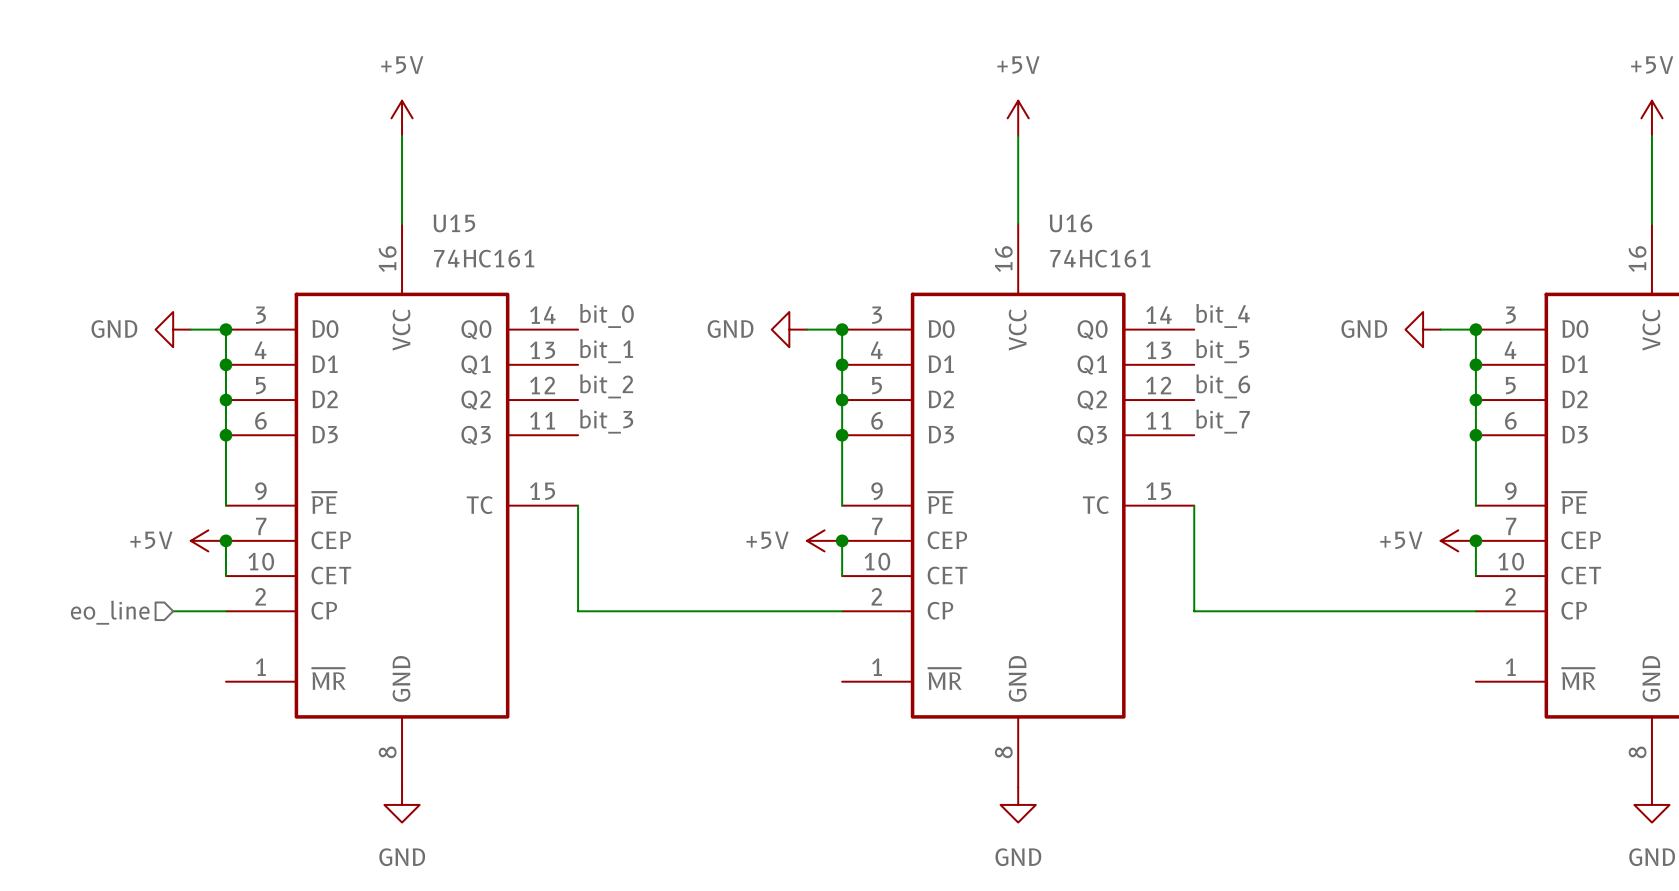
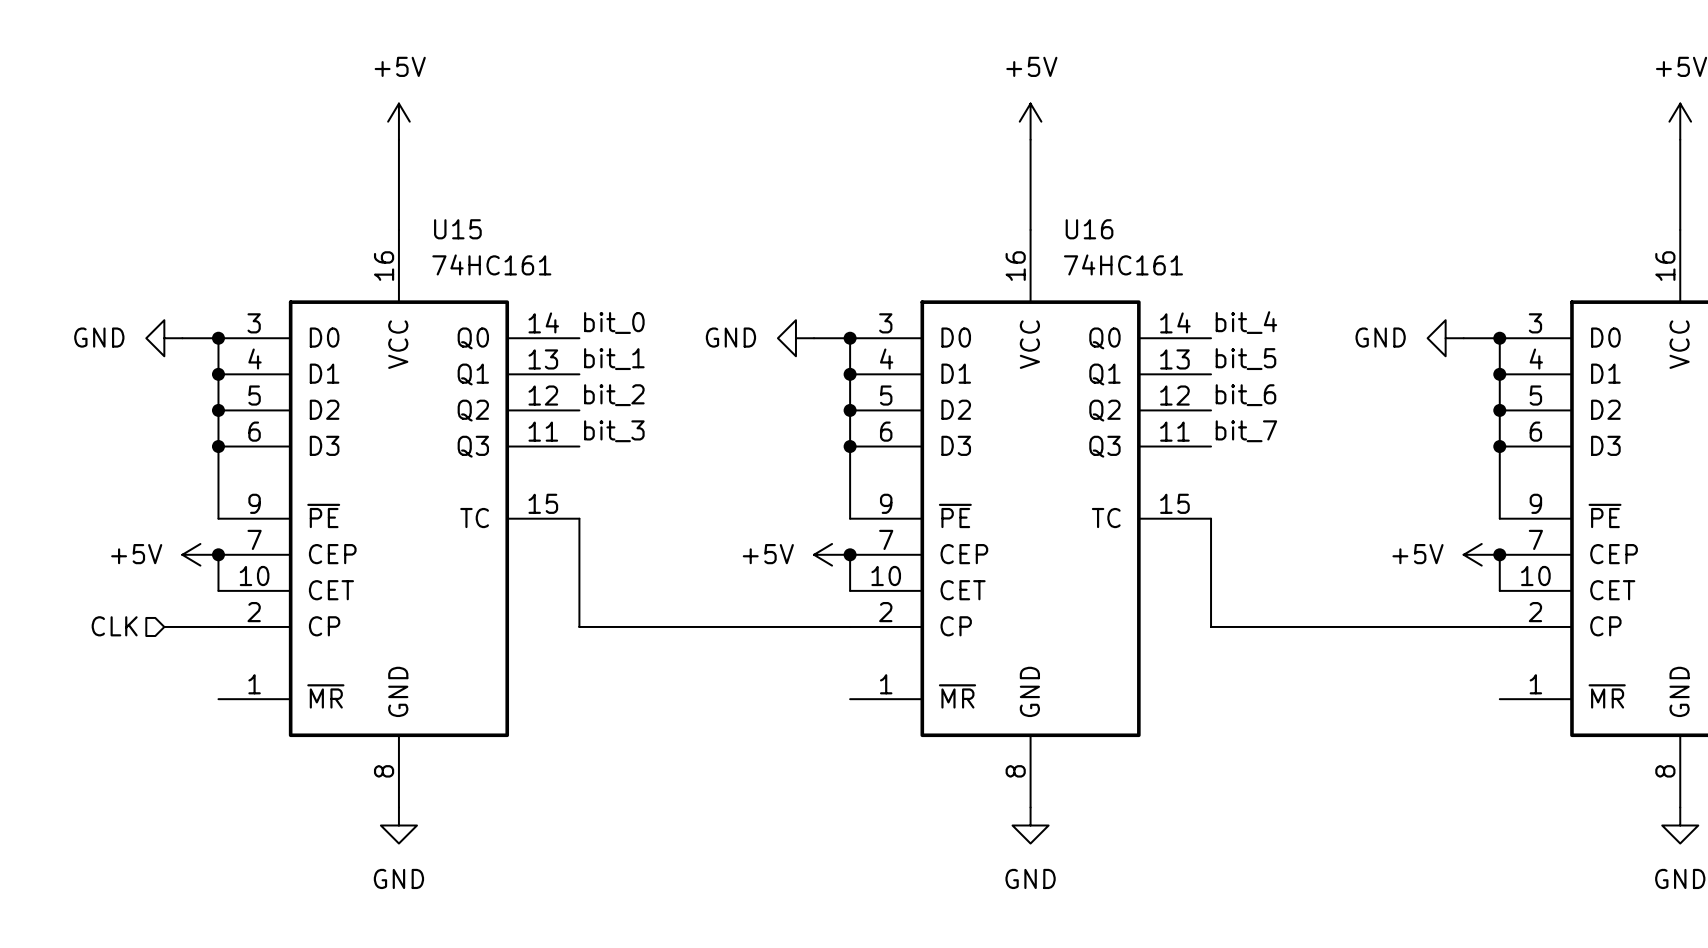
hierarchical label: eo_line (110, 612) -> CLK (114, 626)

